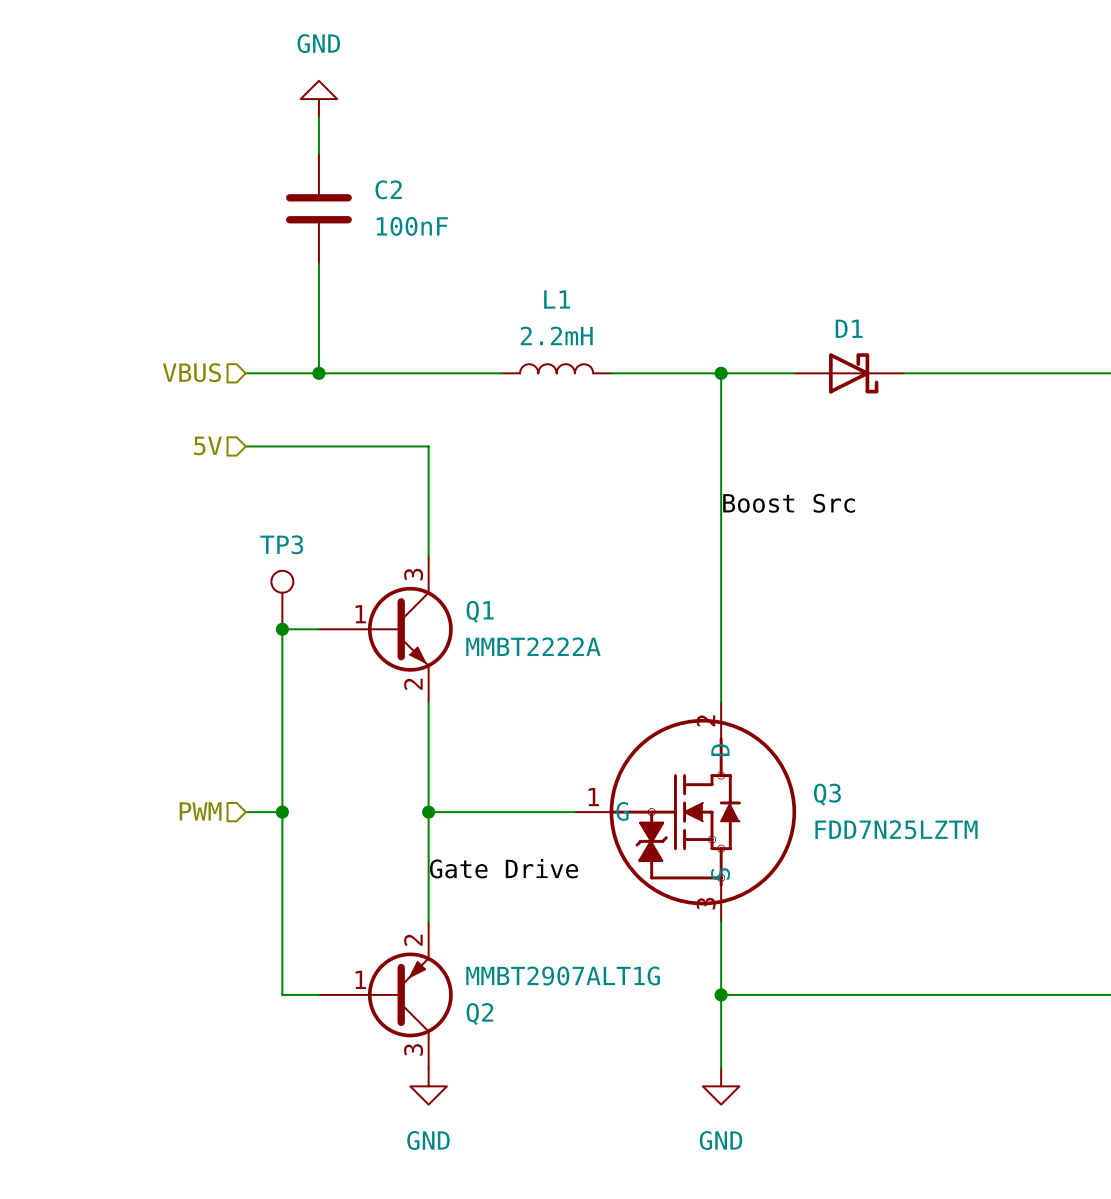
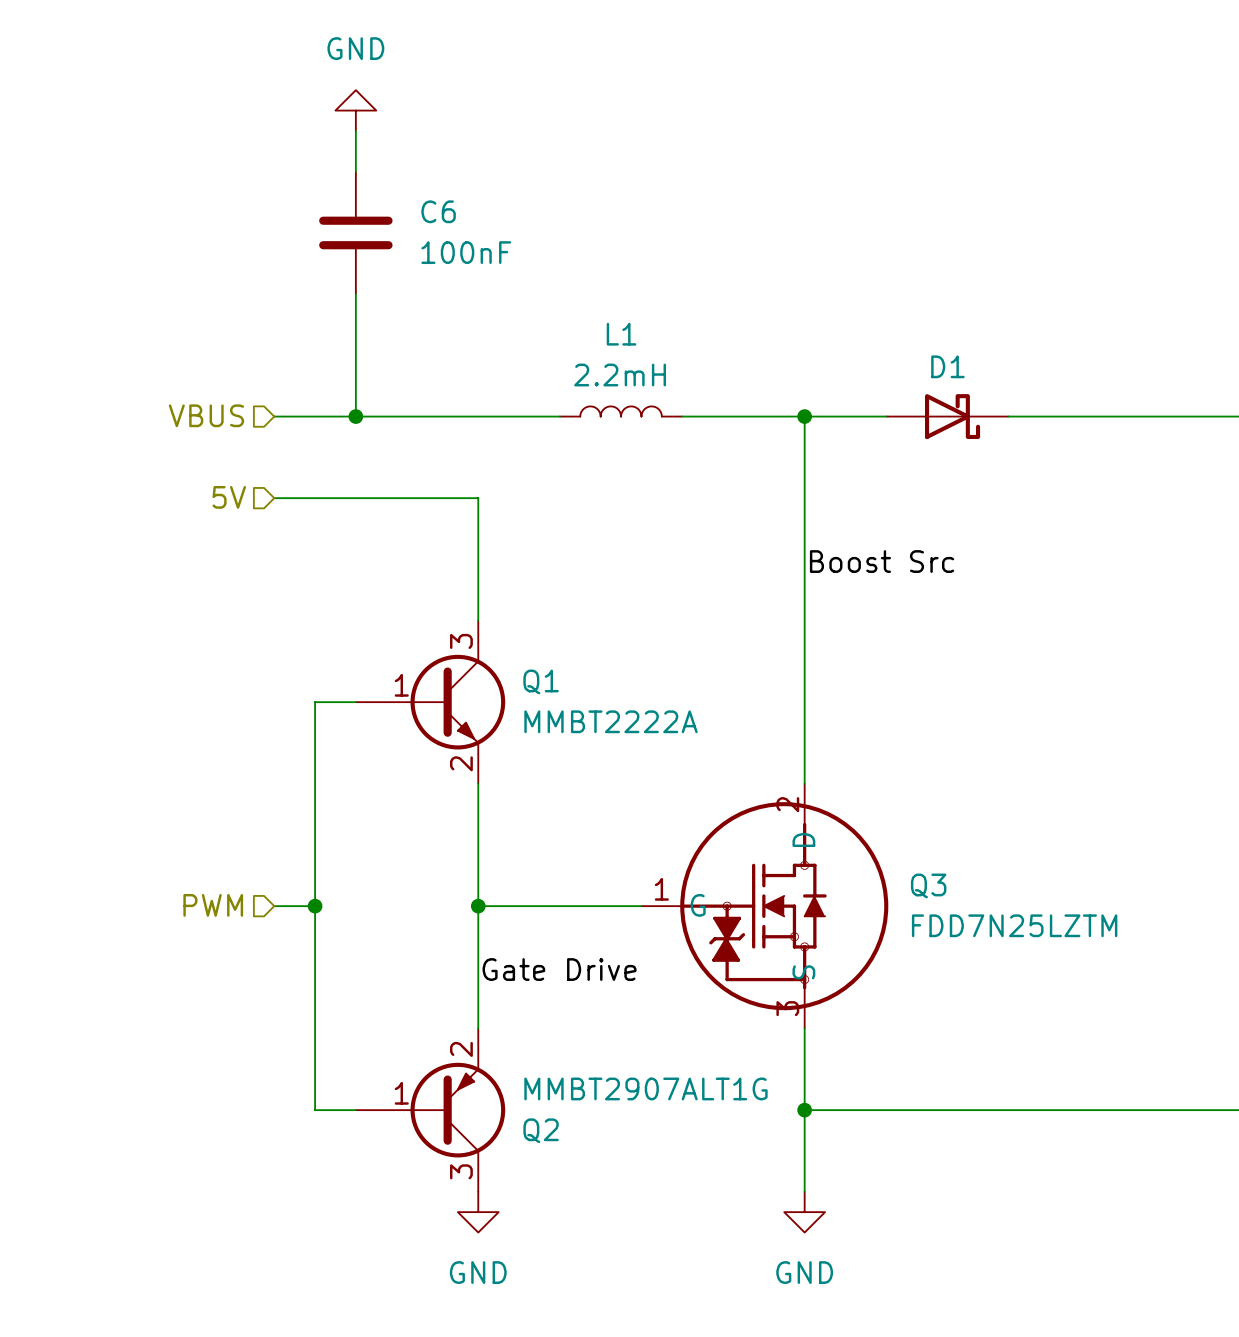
C2 name: C2 (388, 189) -> C6 (438, 211)
TP3: (282, 600) -> none
junction: (282, 629) -> none

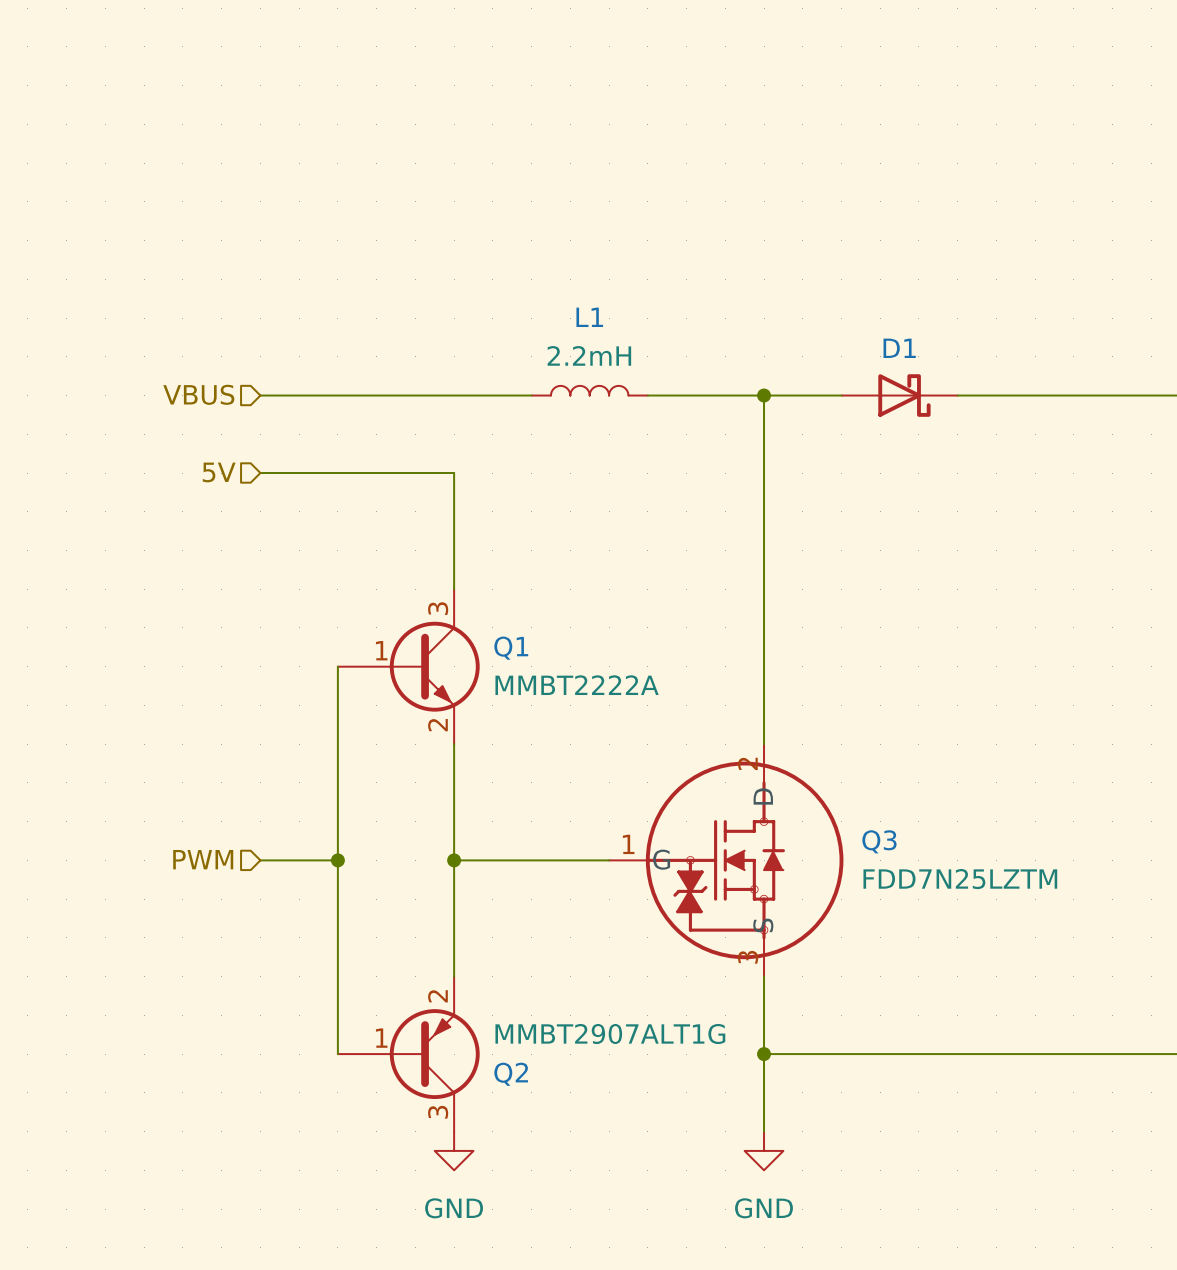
power symbol: GND (355, 110) -> none
wire: (355, 130) (355, 171) -> none
C6: 100nF (355, 232) -> none
wire: (355, 294) (355, 416) -> none
junction: (355, 416) -> none
label: Boost Src (882, 561) -> none
wire: (355, 702) (315, 702) (315, 1110) (355, 1110) -> (337, 666) (337, 1054)
wire: none -> (299, 860) (337, 860)
junction position: (315, 906) -> (337, 860)
label: Gate Drive (559, 969) -> none

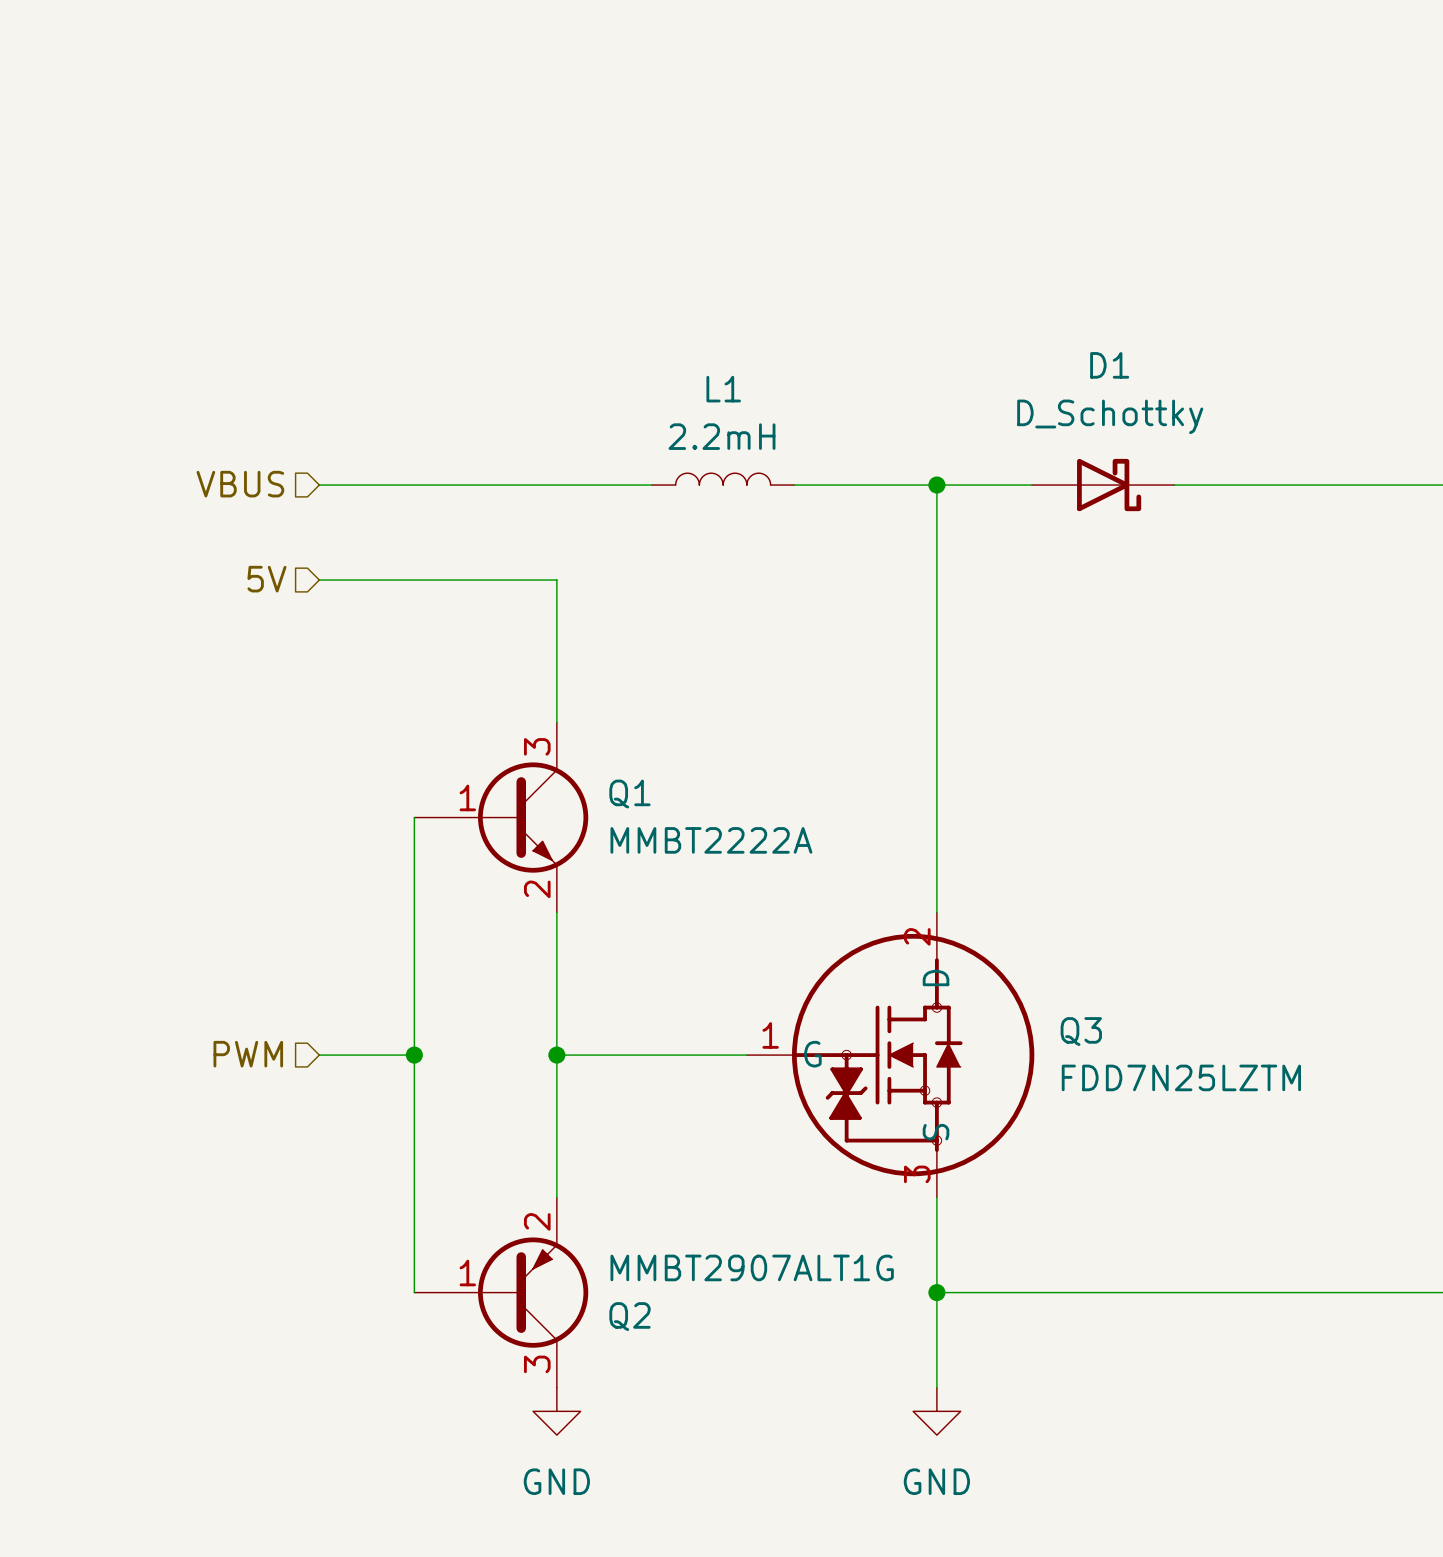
D1 value: none -> D_Schottky (1110, 416)
D1 name position: D1 (899, 348) -> D1 (1109, 365)

